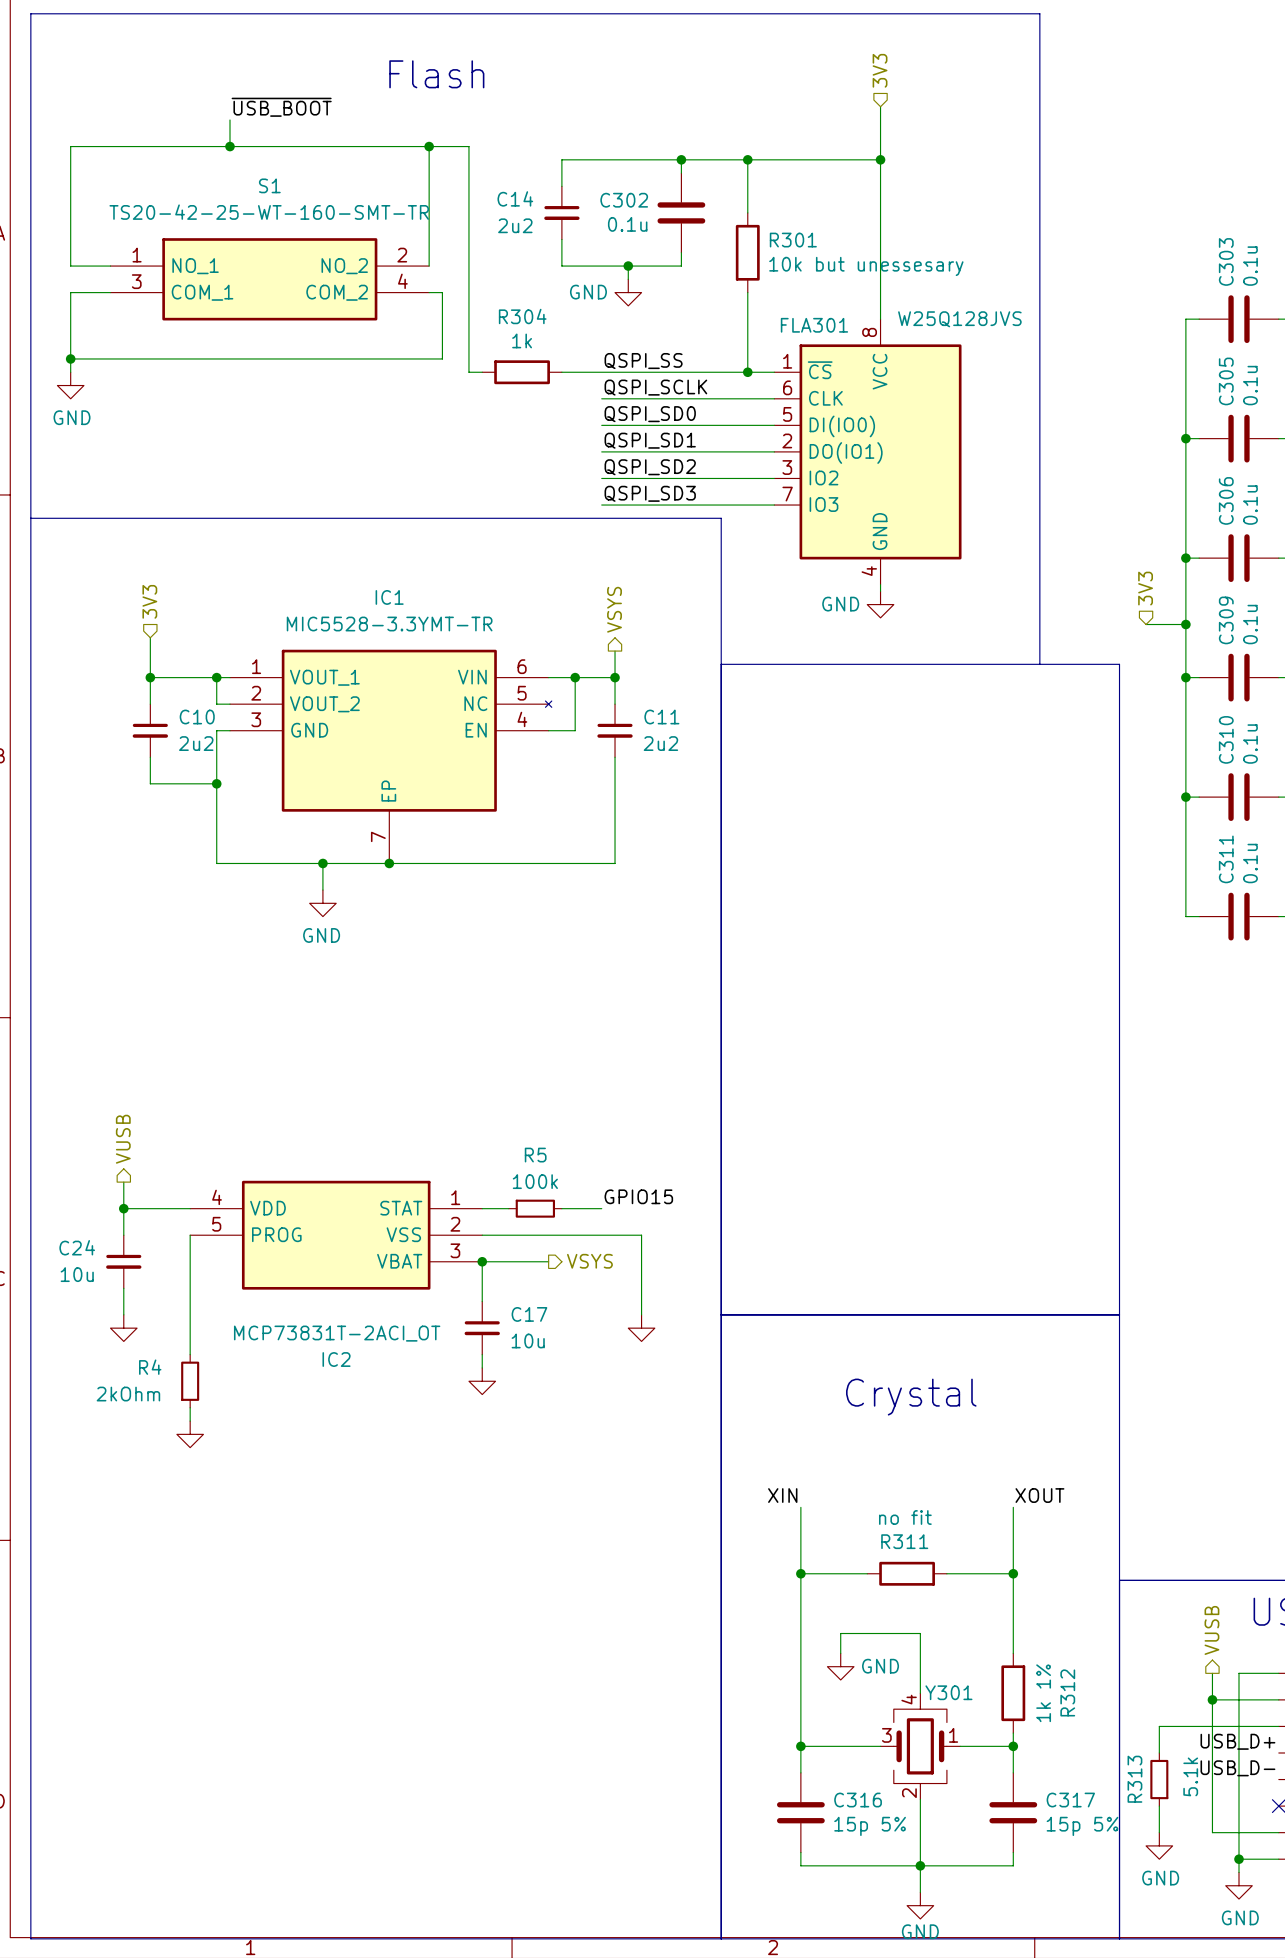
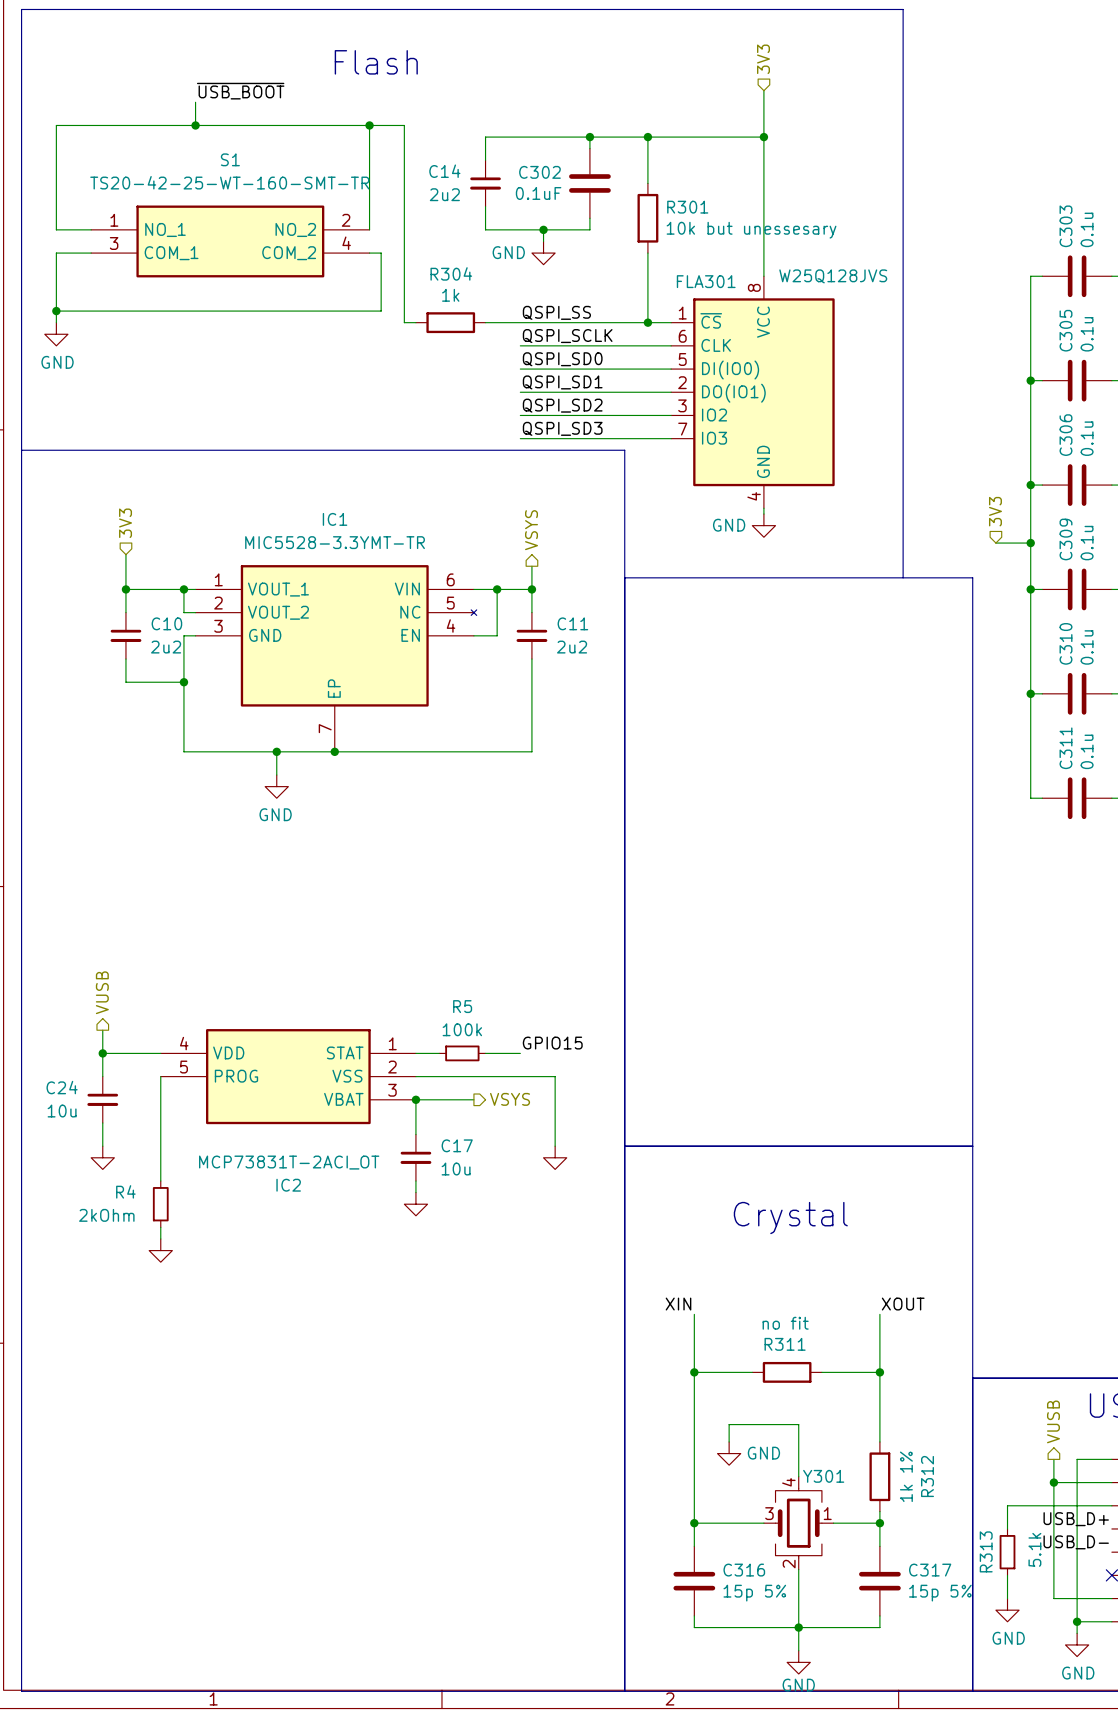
C302 value: 0.1u (627, 224) -> 0.1uF (538, 193)

